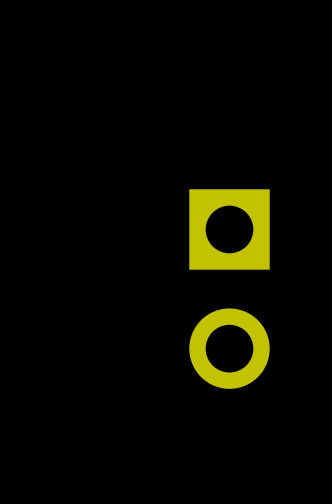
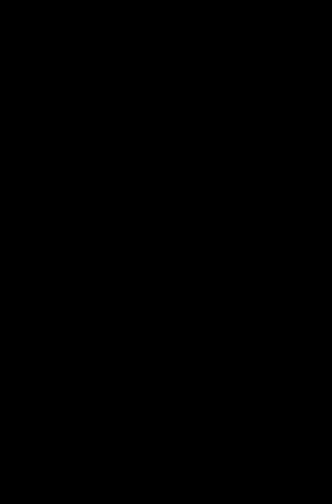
part: (229, 289) -> none

